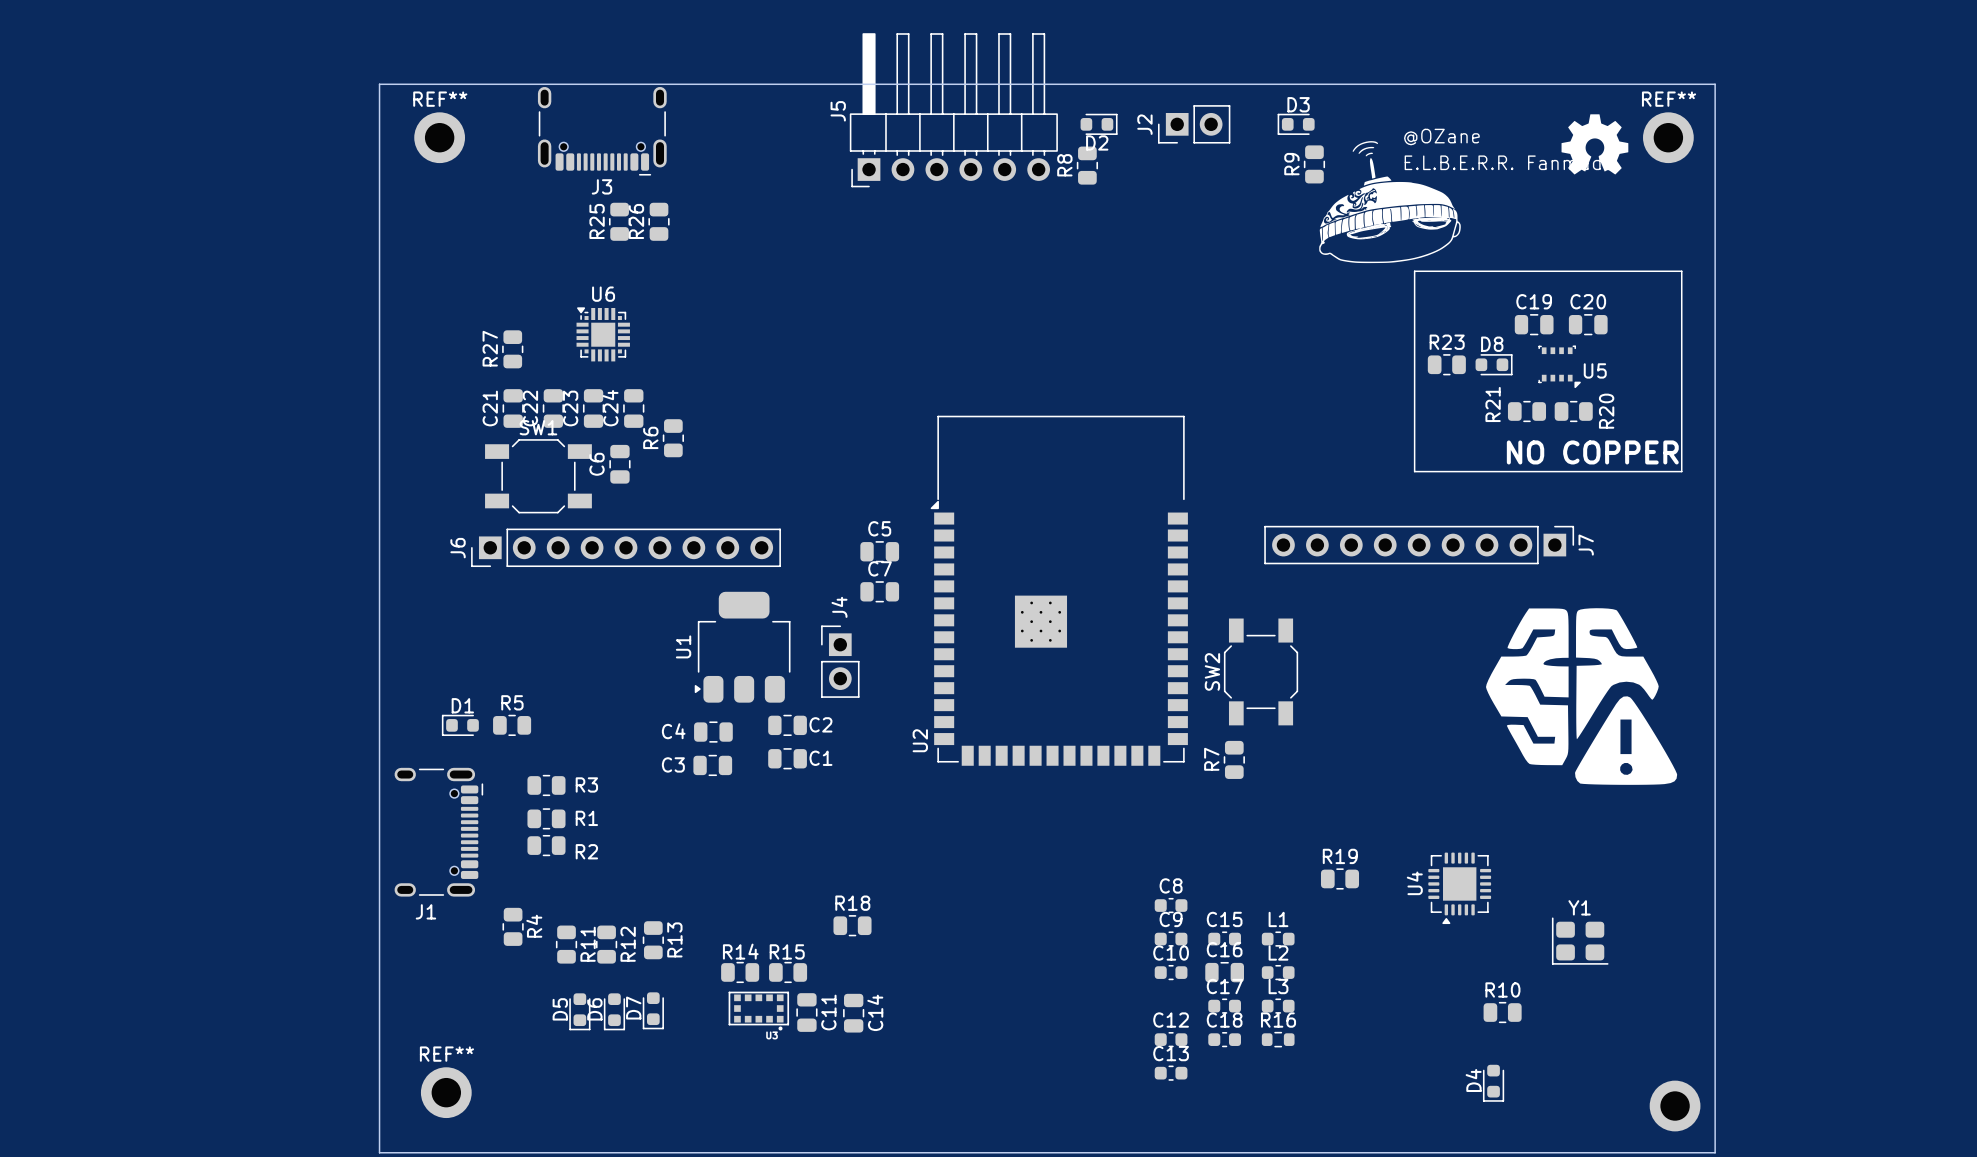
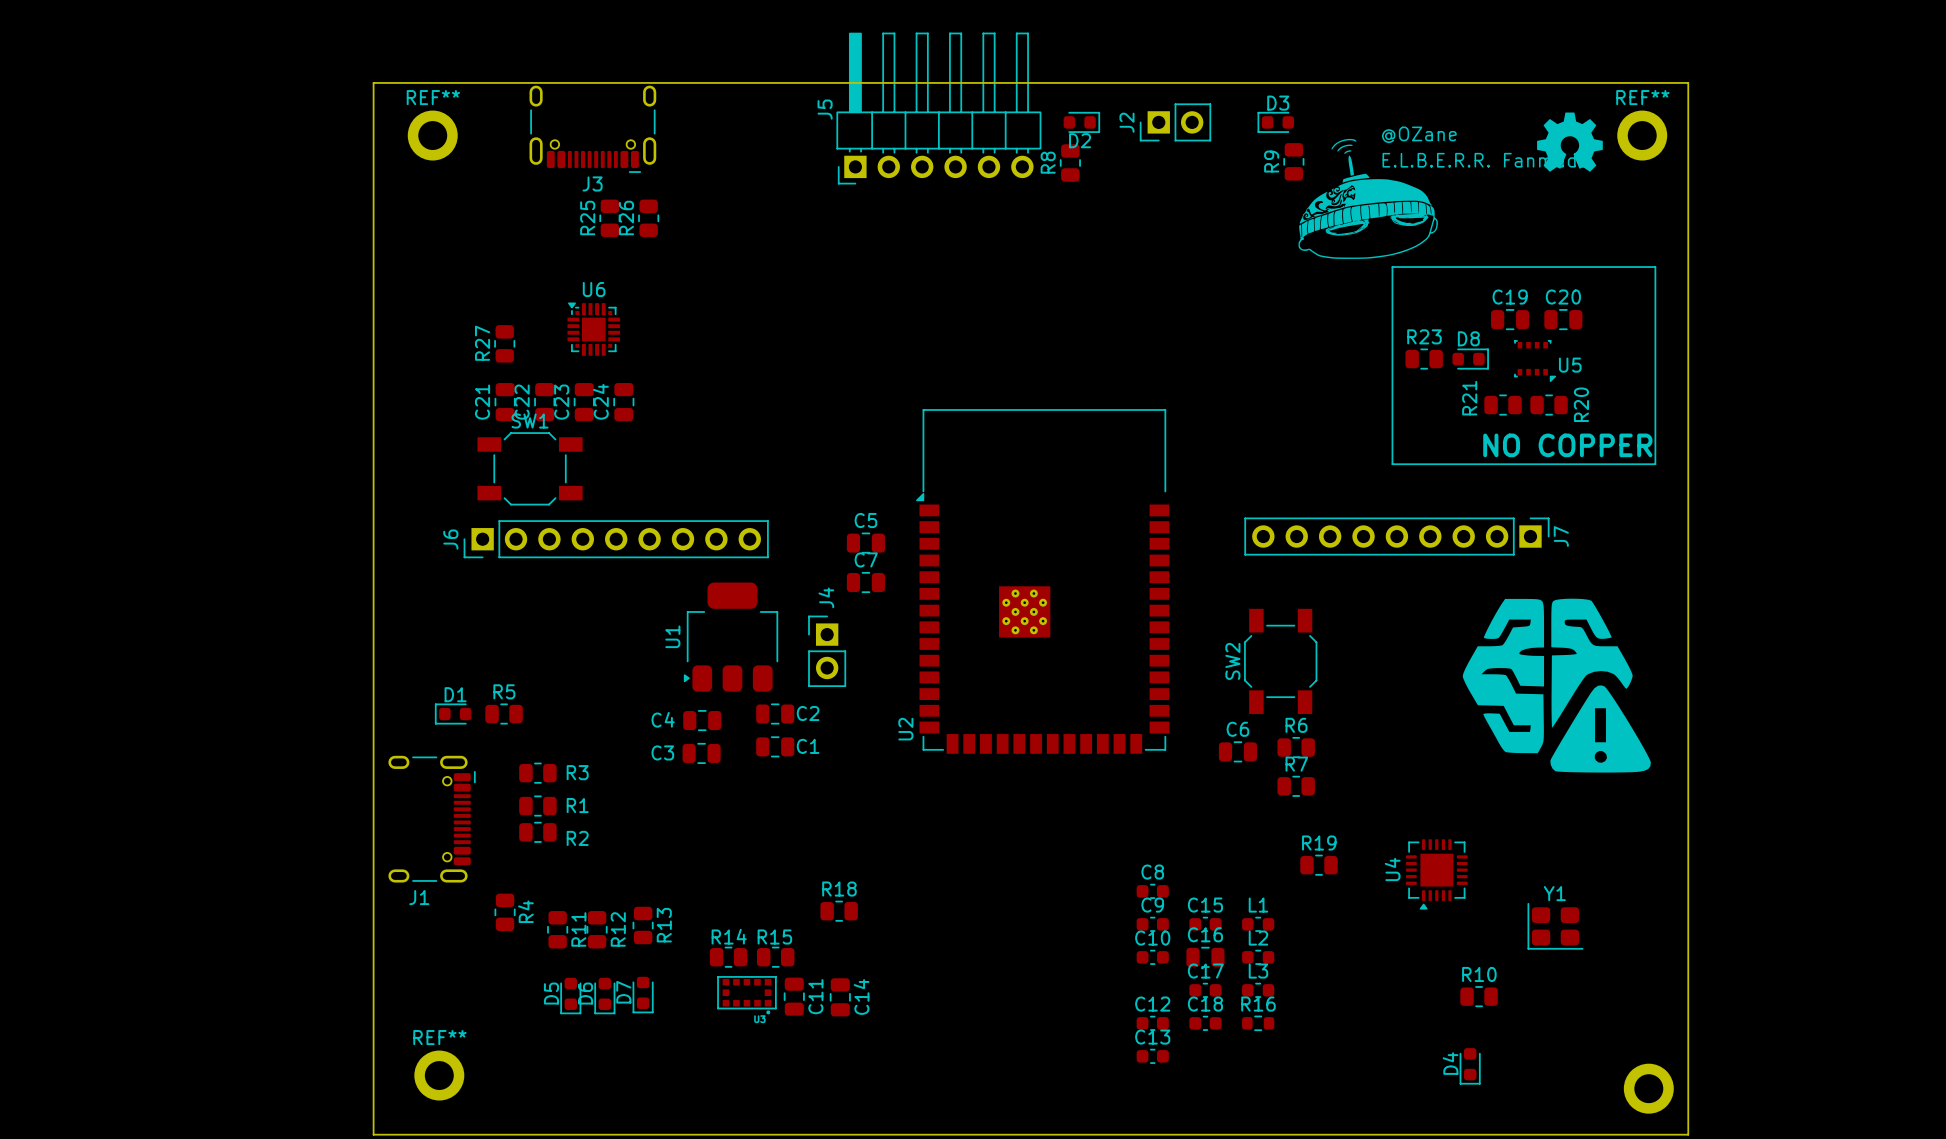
R6 rotation: 0° (673, 438) -> 90° clockwise (1296, 747)
R6 position: (673, 438) -> (1296, 747)
C6 rotation: 0° (619, 464) -> 90° clockwise (1237, 751)
C6 position: (619, 464) -> (1237, 751)
SW2 position: (1261, 671) -> (1280, 661)
R7 rotation: 0° (1234, 759) -> 90° clockwise (1296, 786)
R7 position: (1234, 759) -> (1296, 786)

